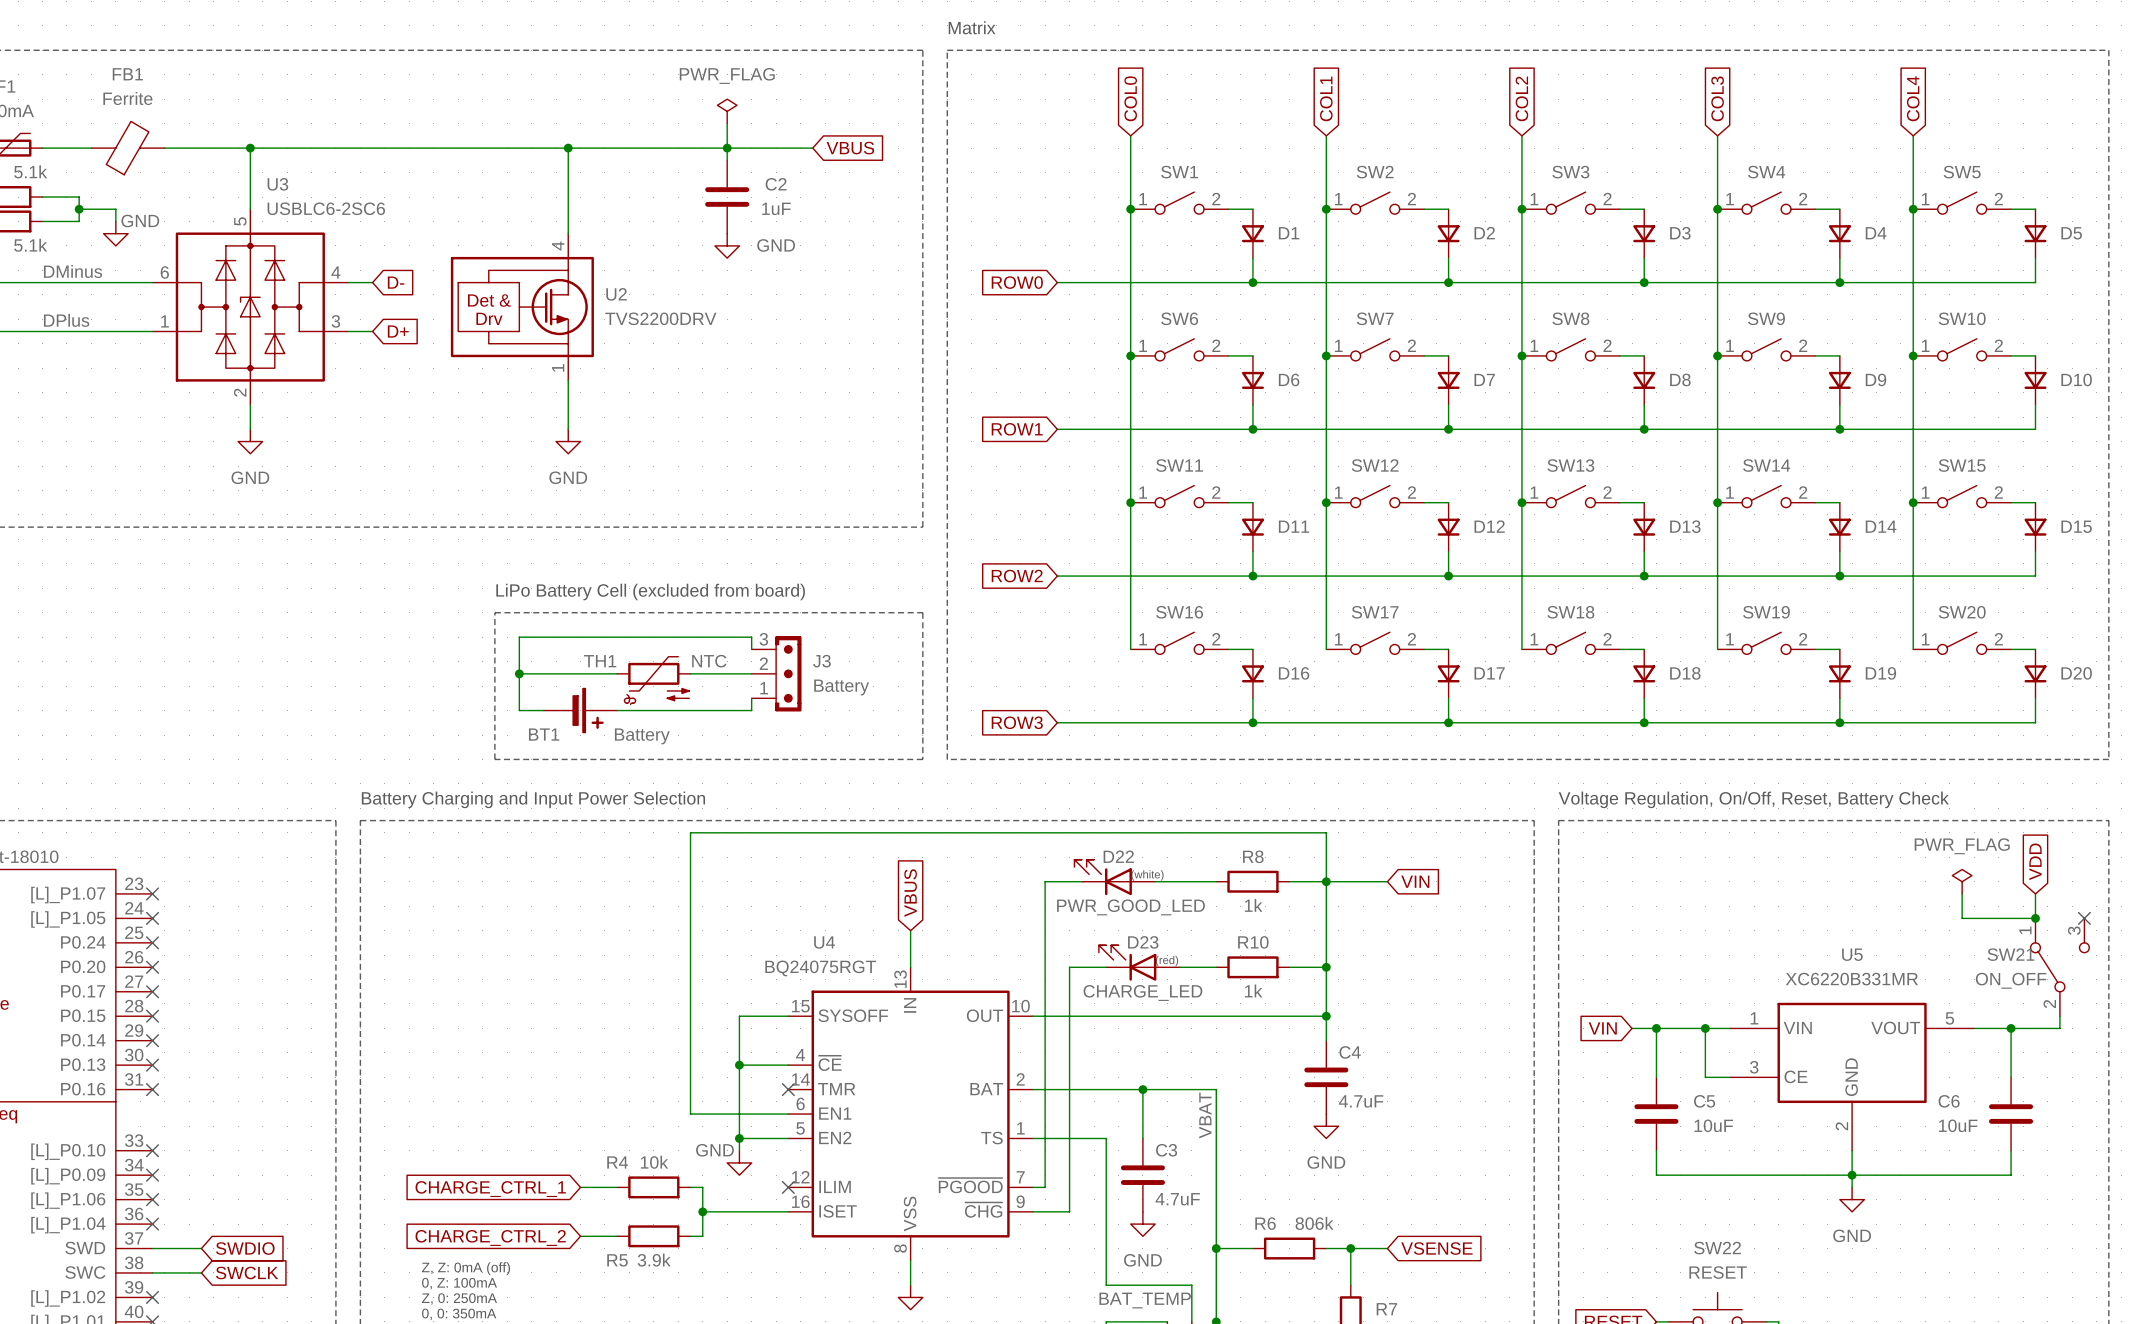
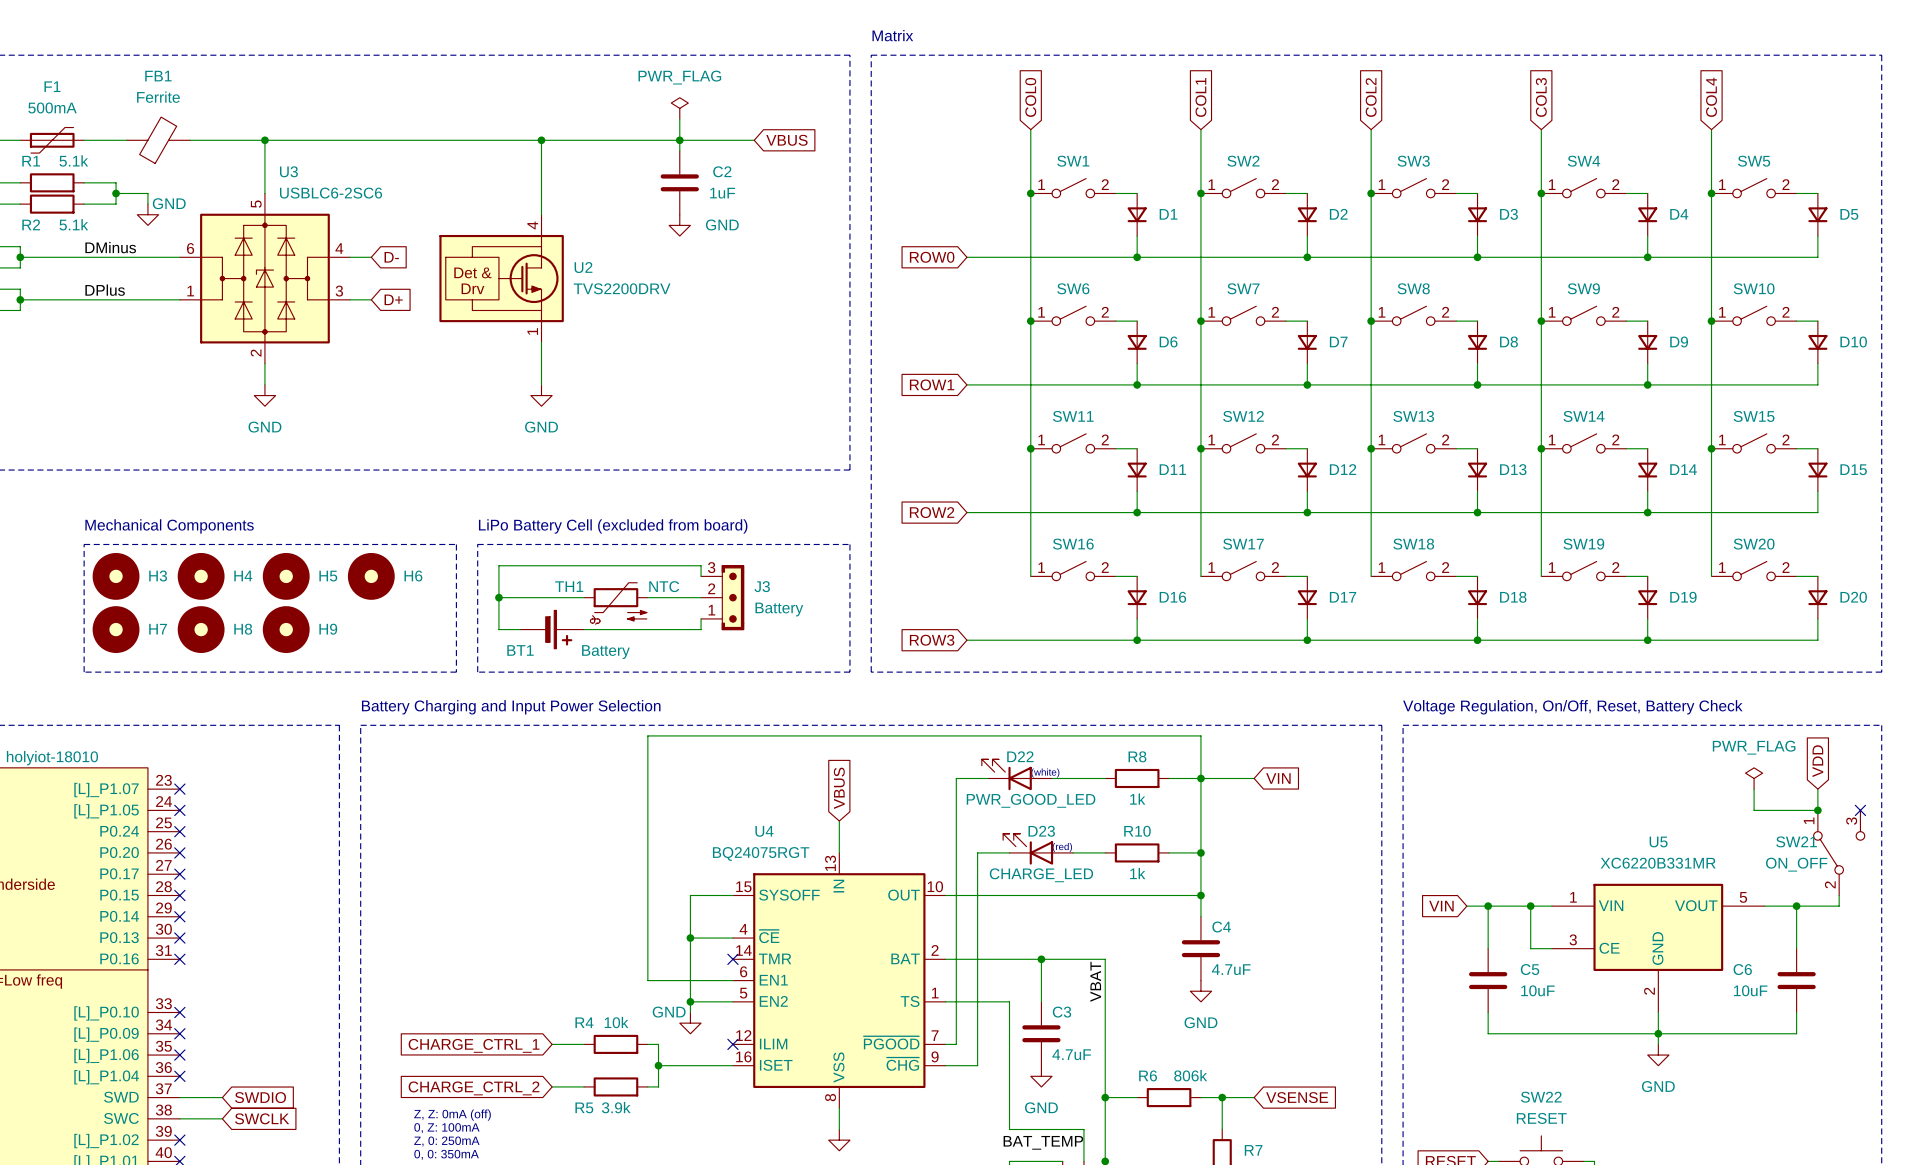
text: none -> Mechanical Components (169, 526)
line: none -> (84, 544) (456, 544) (456, 672) (84, 672) (84, 544)
H3: none -> (116, 576)
H4: none -> (201, 576)
H5: none -> (286, 576)
H6: none -> (371, 576)
H7: none -> (116, 629)
H8: none -> (201, 629)
H9: none -> (286, 629)

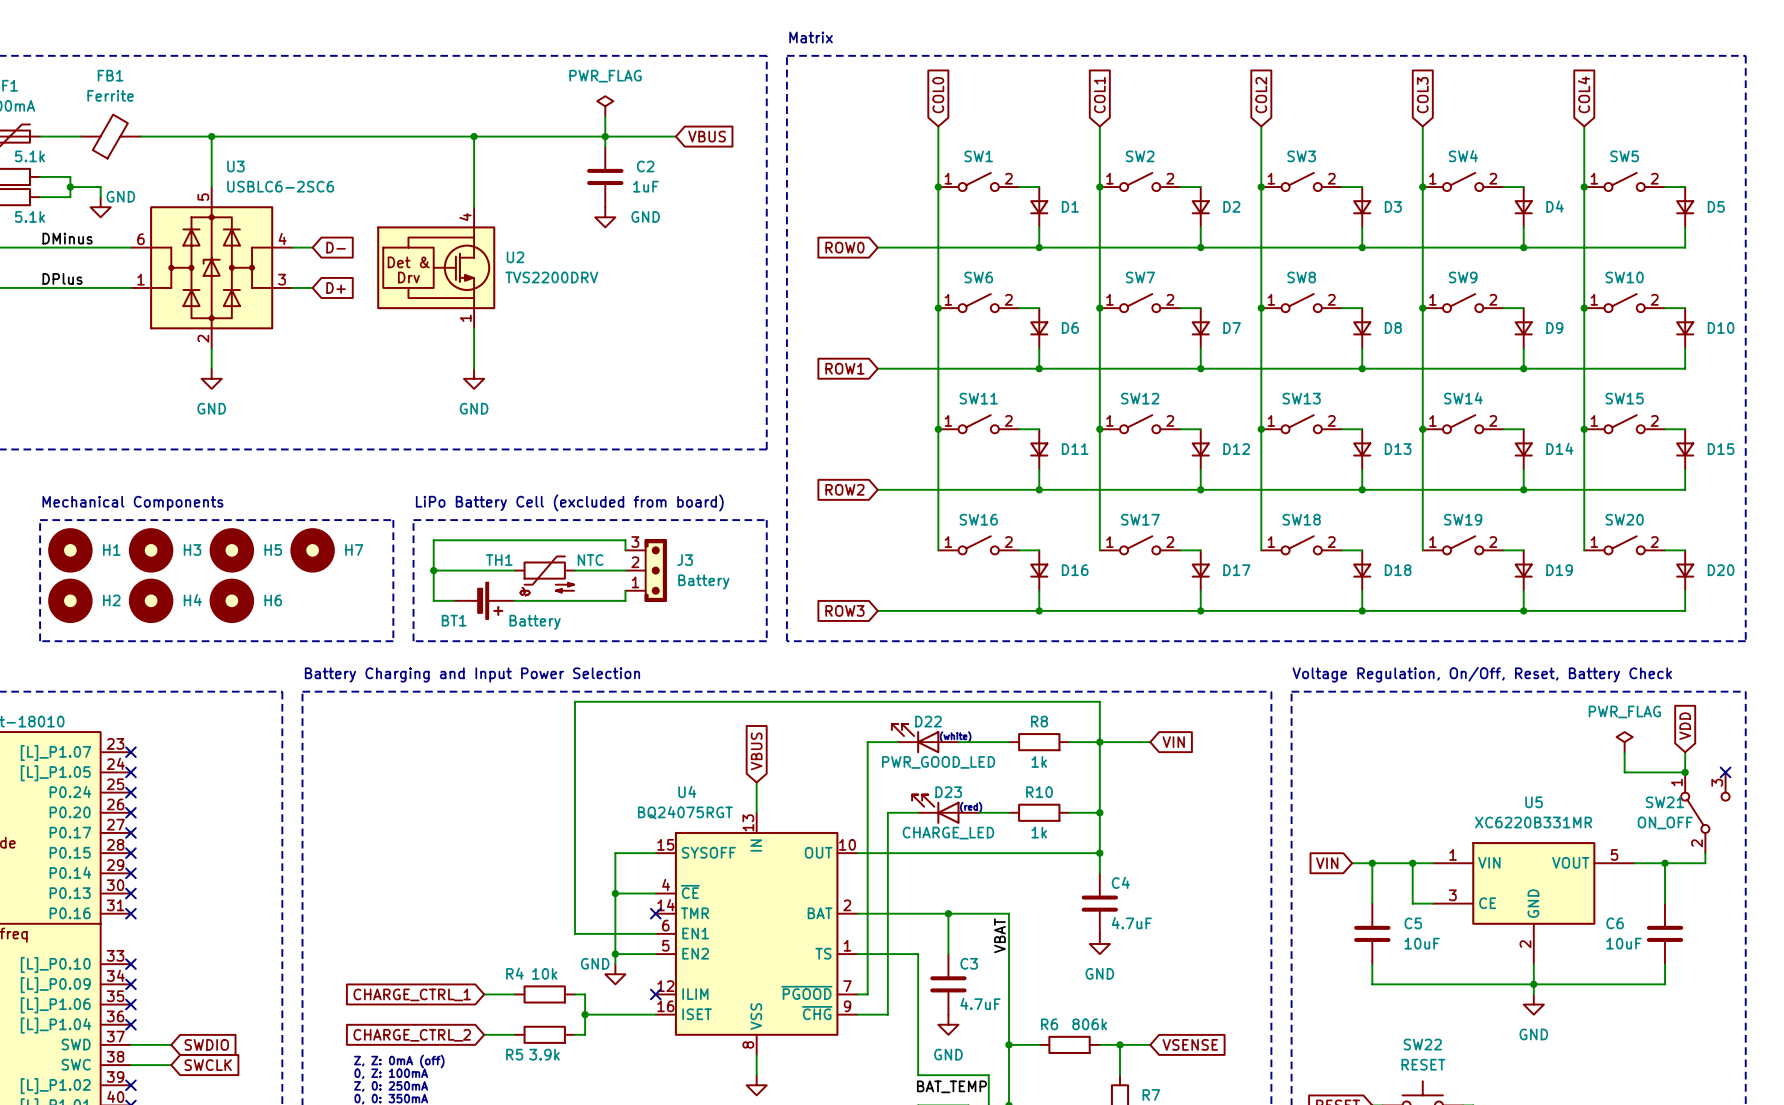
H3 name: H3 (158, 575) -> H1 (111, 550)
H6 name: H6 (413, 575) -> H7 (354, 550)
H4 name: H4 (243, 576) -> H3 (192, 550)
H7 name: H7 (158, 629) -> H2 (111, 600)
H8 name: H8 (243, 629) -> H4 (192, 600)
H9 name: H9 (328, 629) -> H6 (273, 600)

